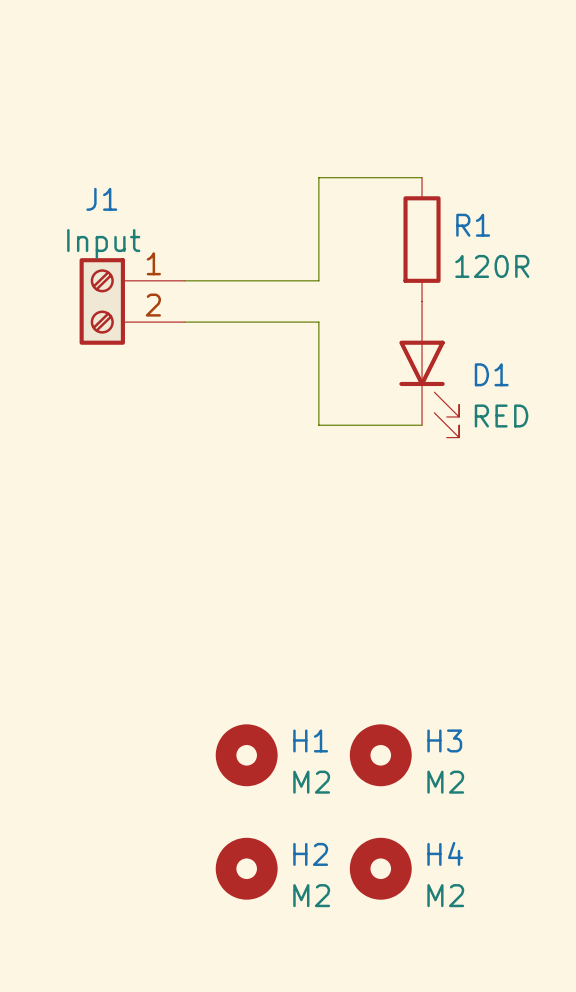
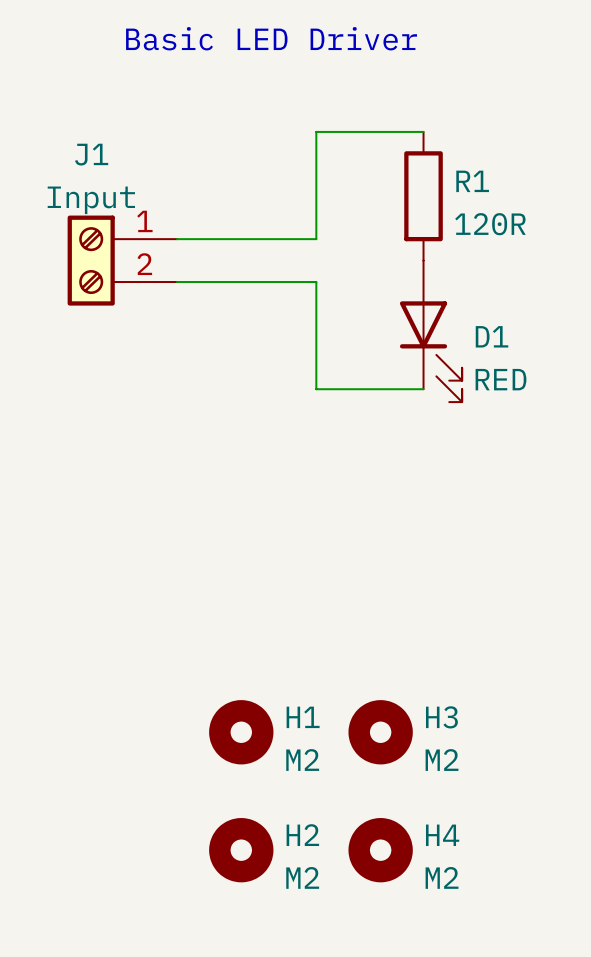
text: none -> Basic LED Driver (271, 38)

